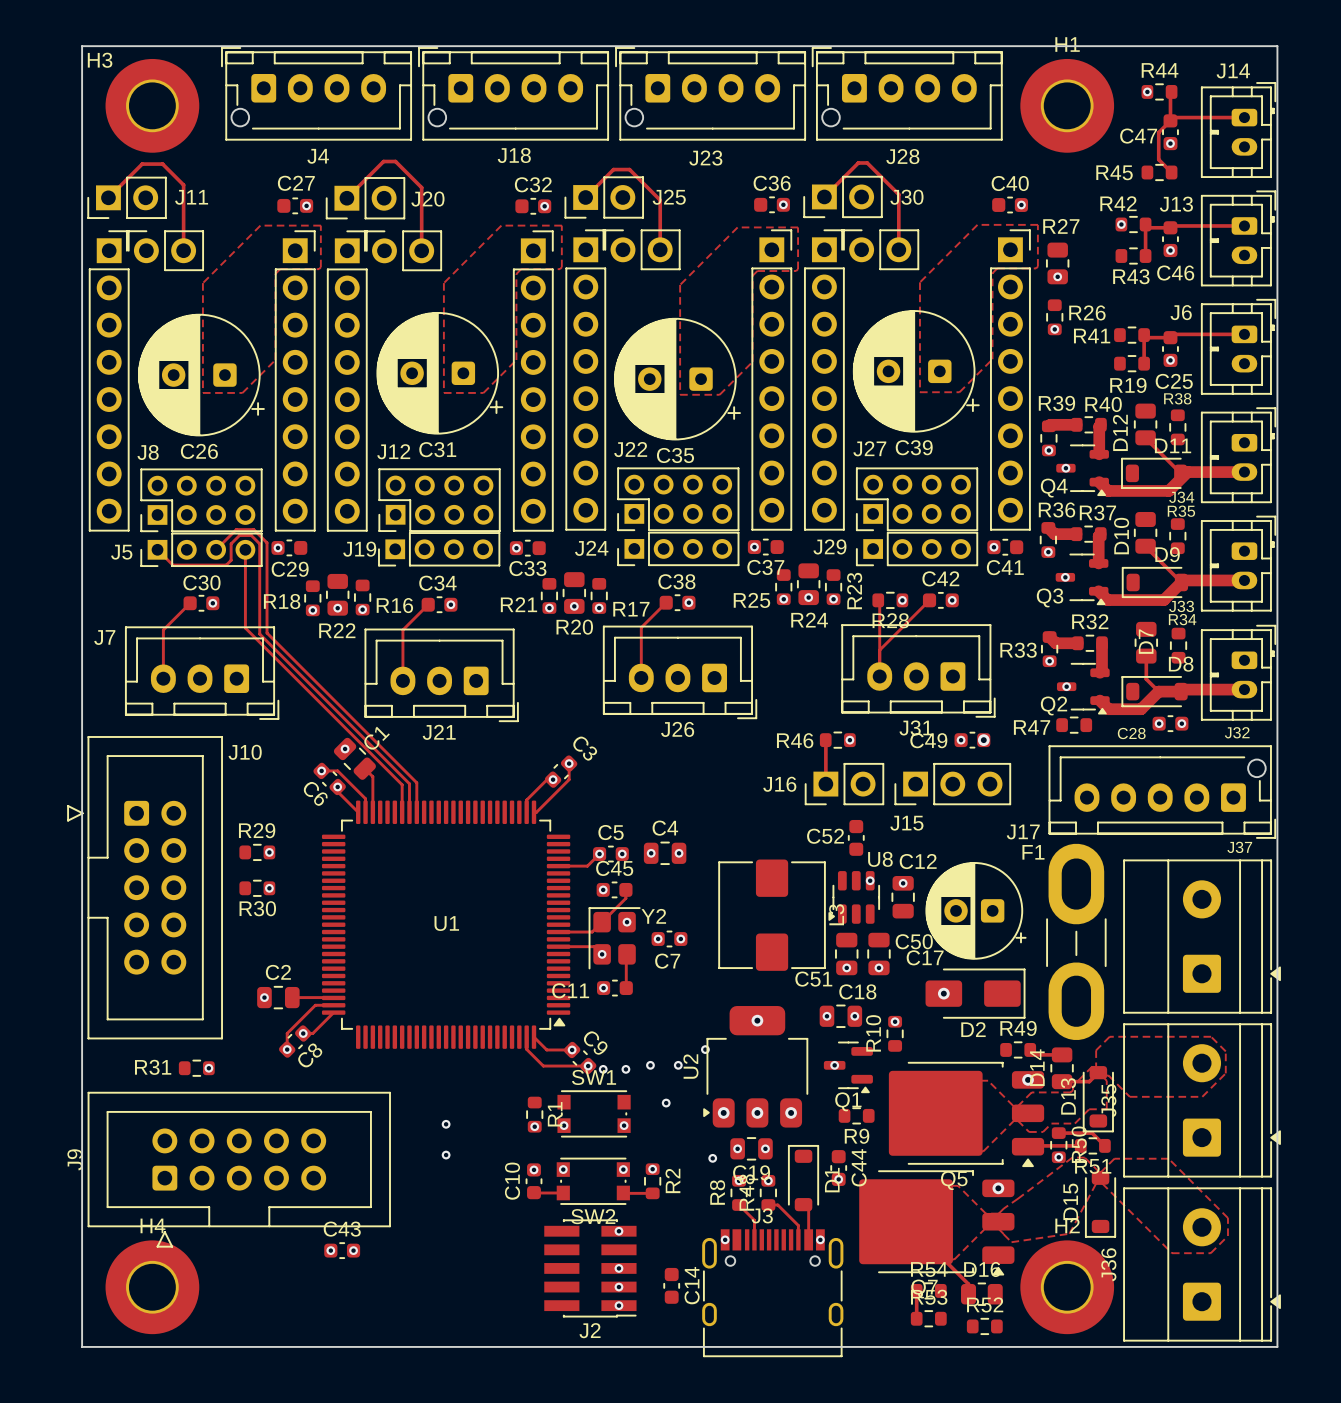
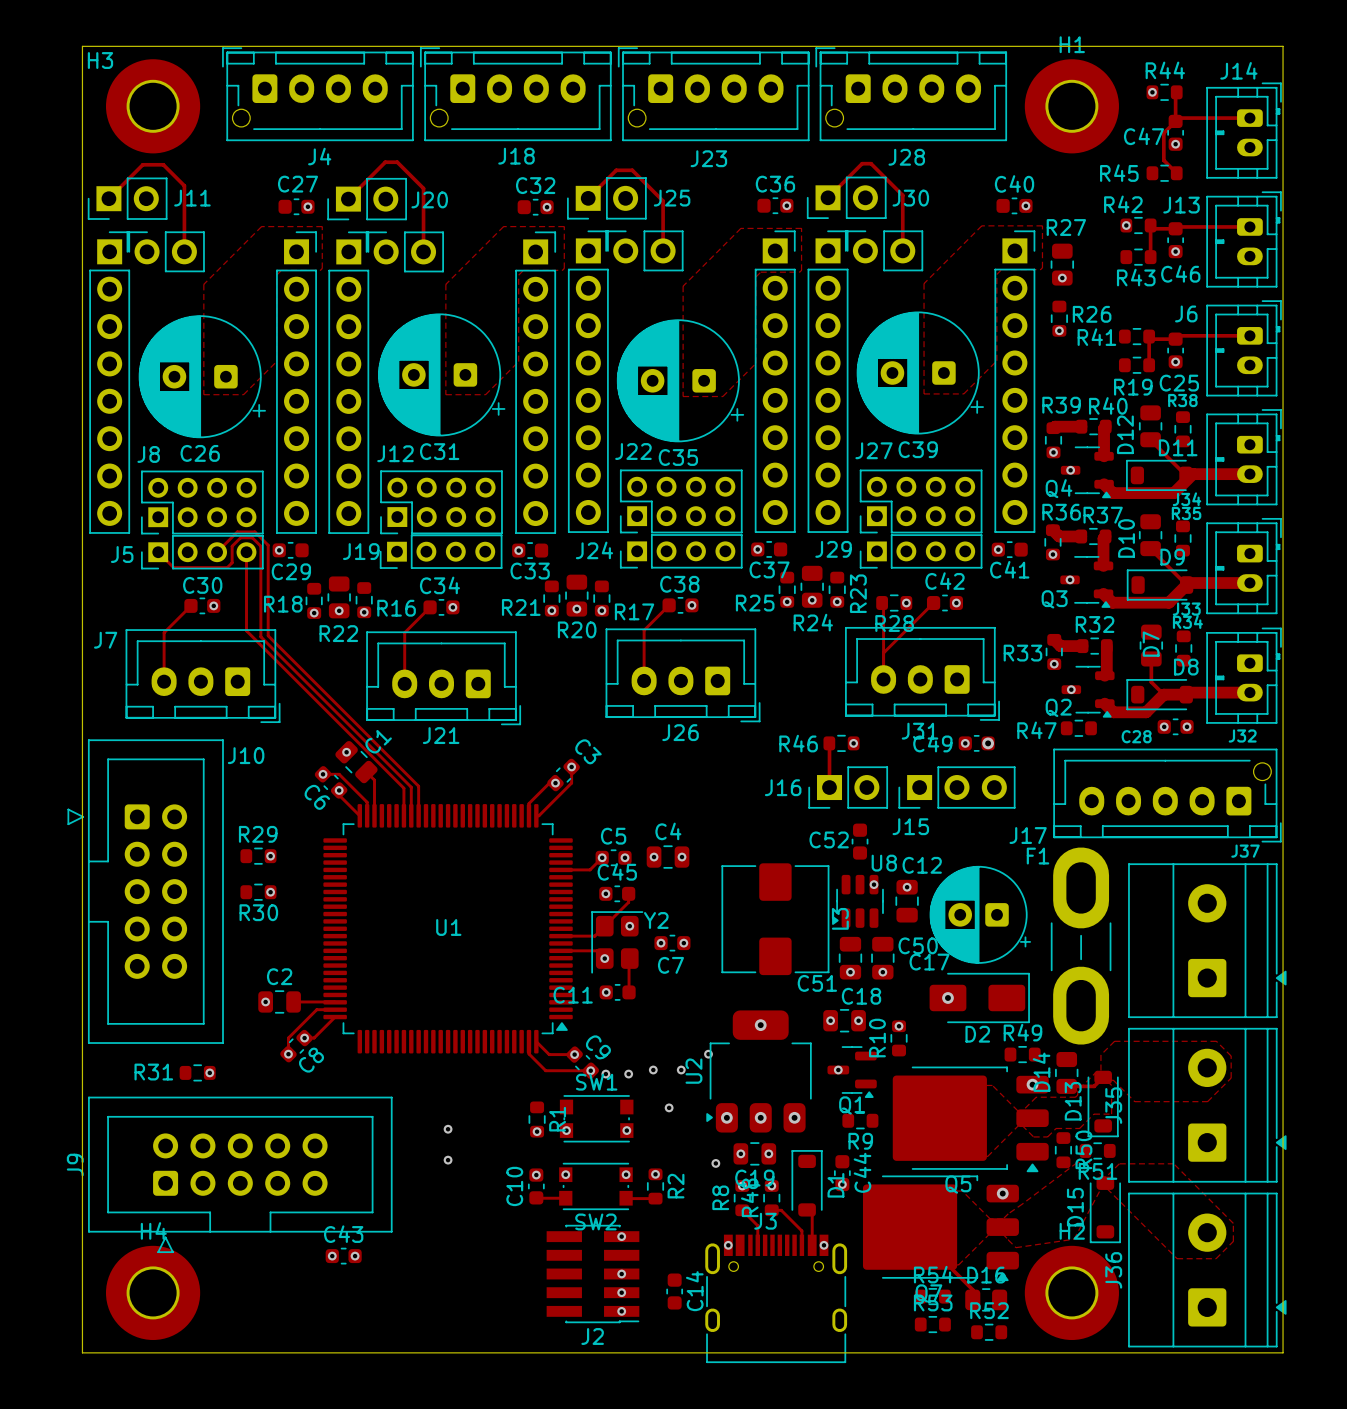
track: (1030, 1049) (1035, 1054) (1062, 1054) -> none
track: (1058, 1133) (1092, 1133) (1104, 1145) -> none
track: (1080, 1145) (1028, 1146) -> none
via: (1058, 1157) -> none
track: (916, 1290) (916, 1318) -> none

